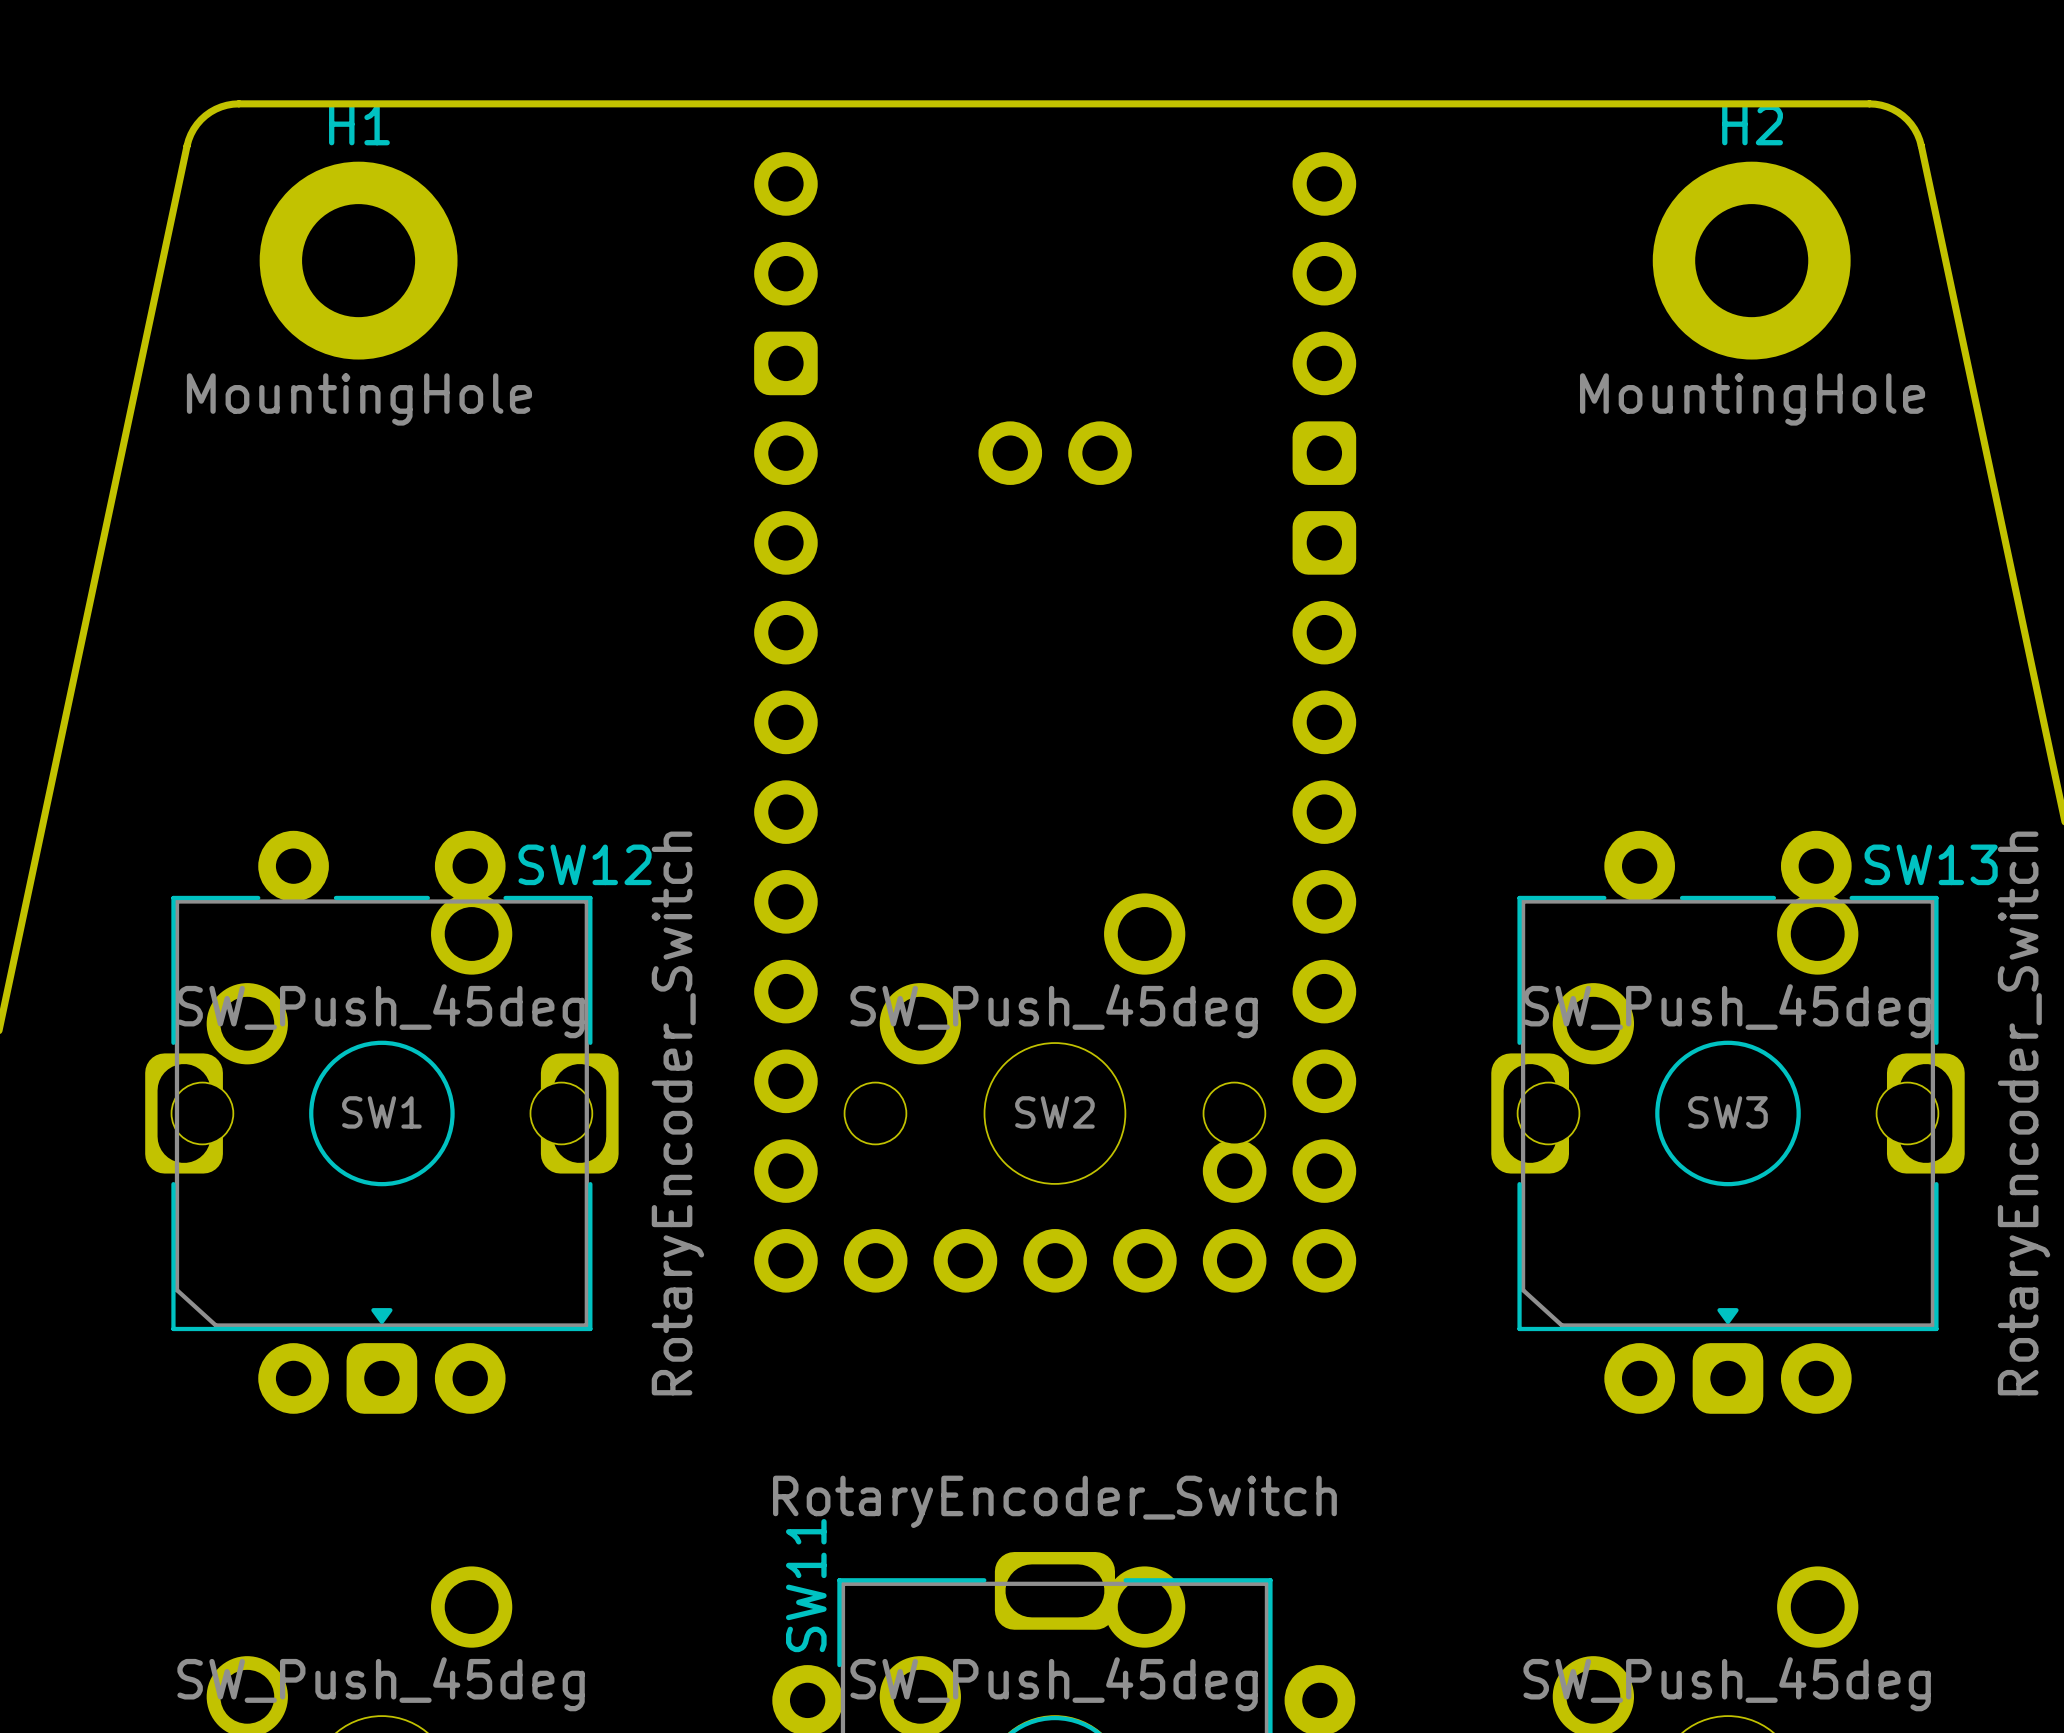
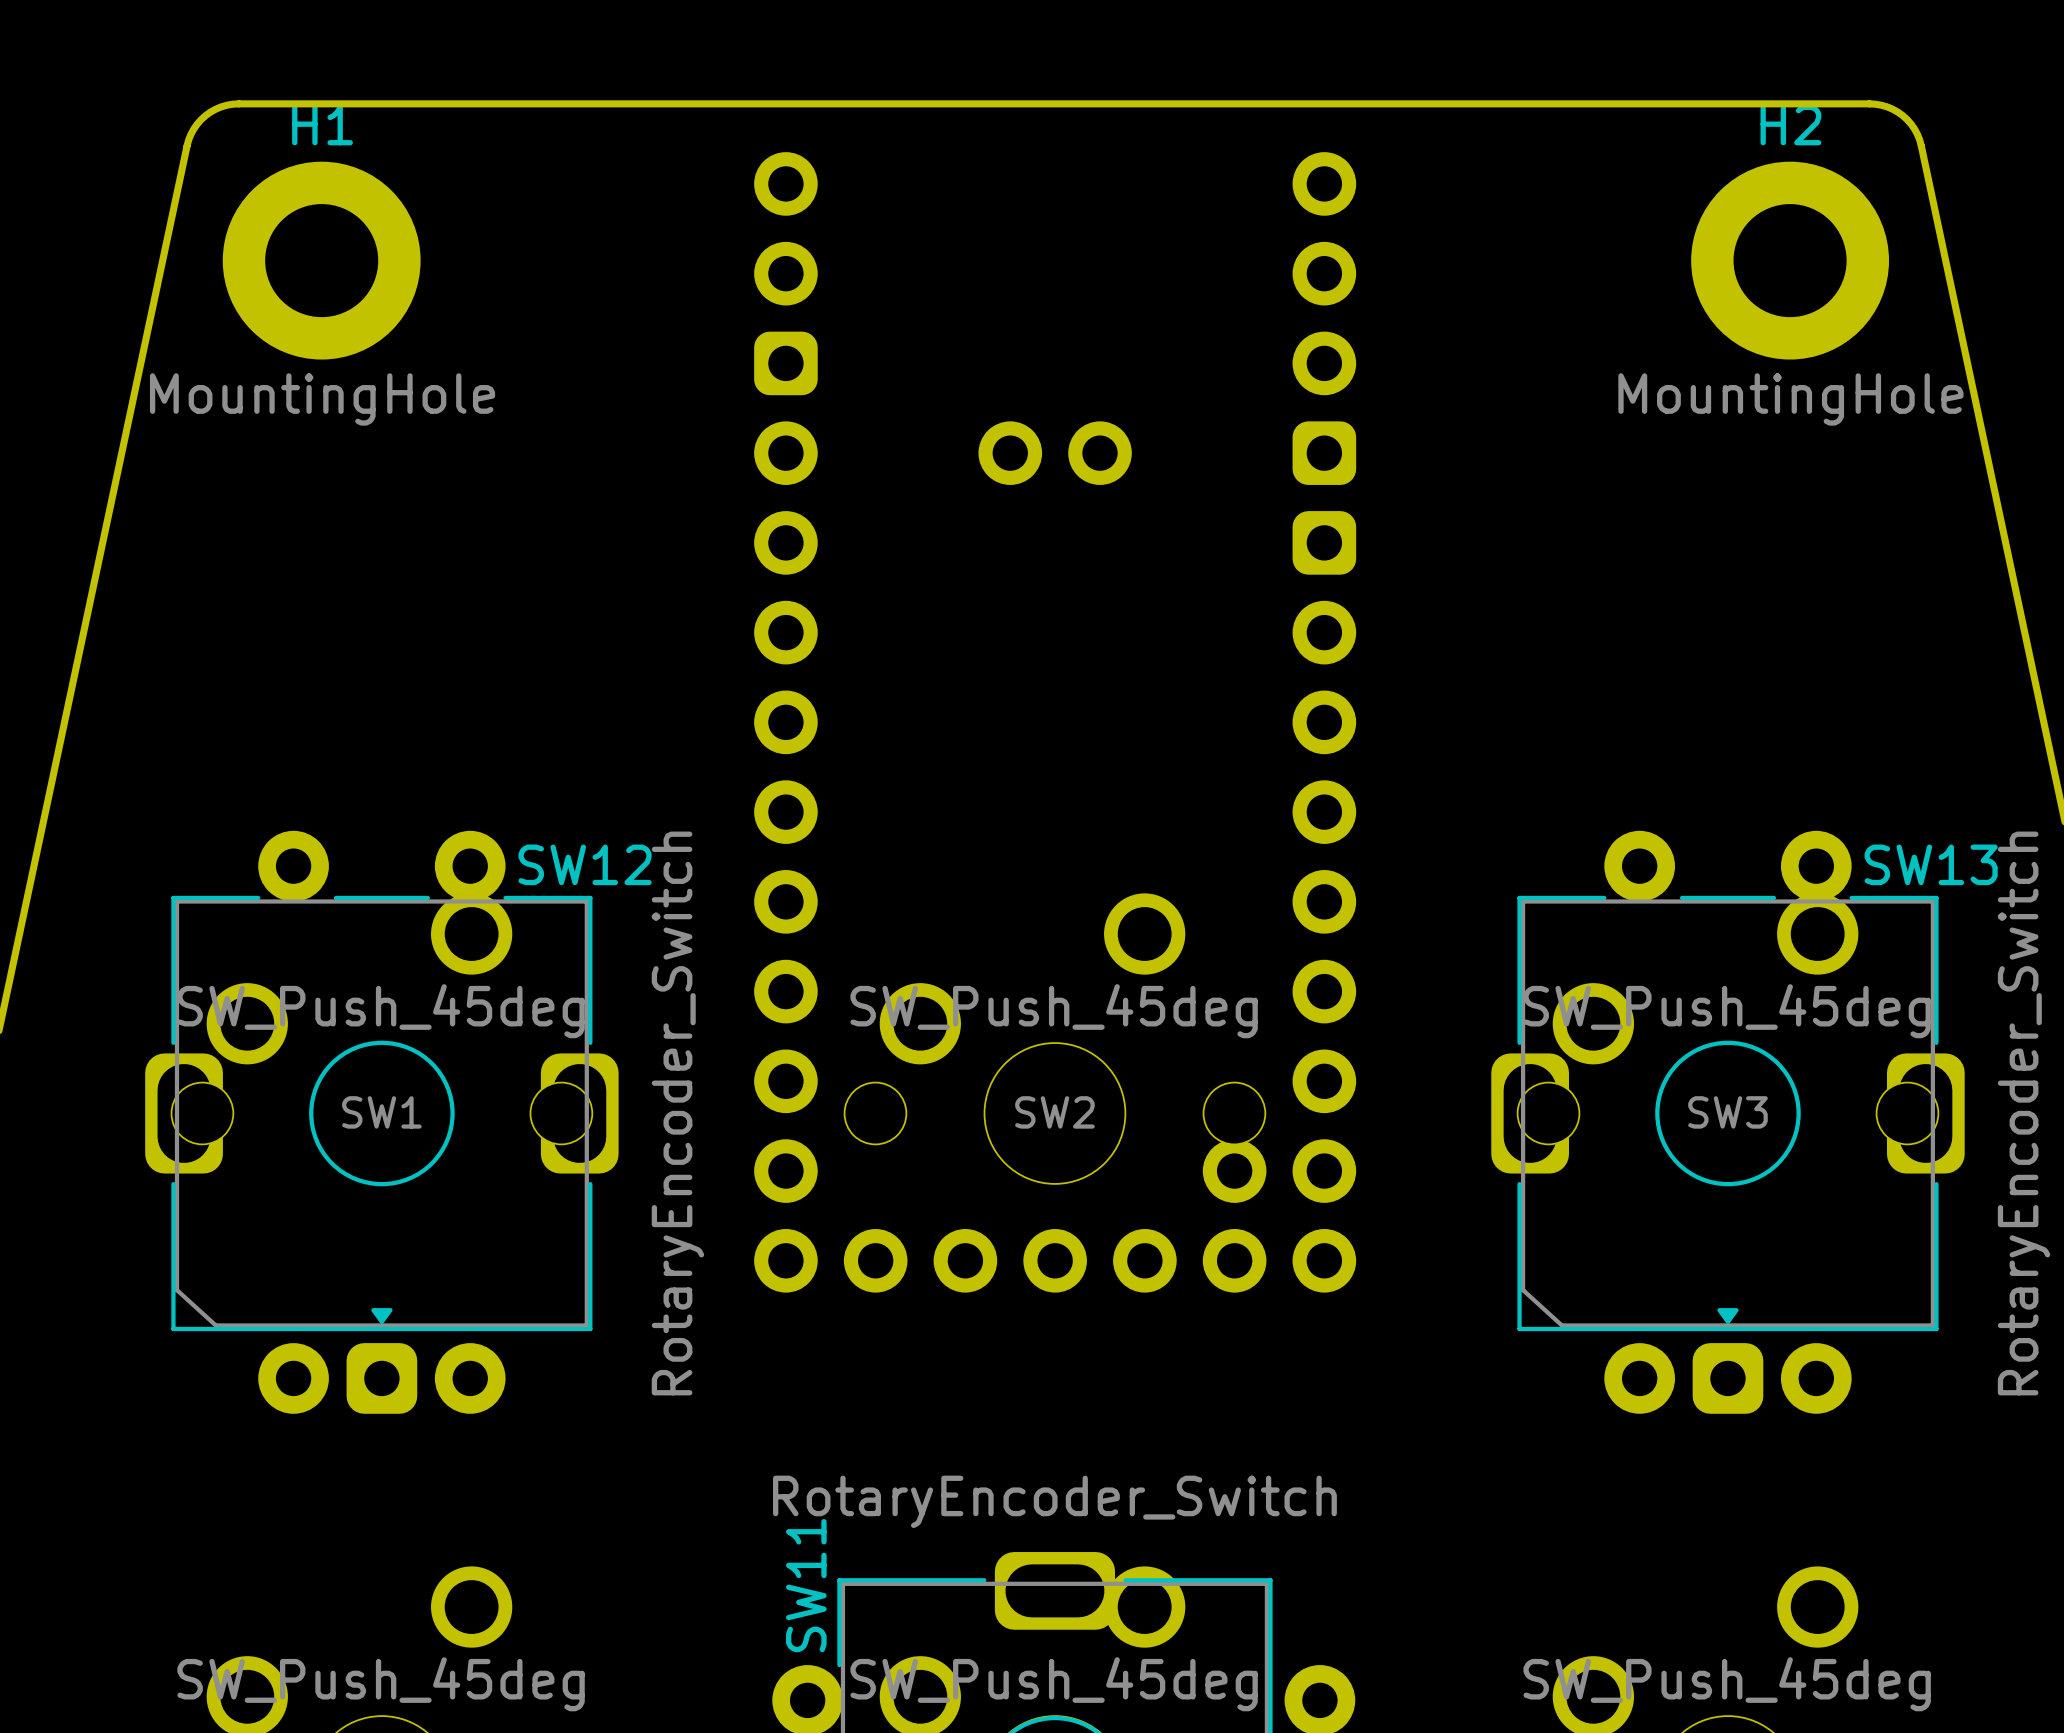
H1 position: (358, 260) -> (321, 260)
H2 position: (1751, 260) -> (1790, 260)

